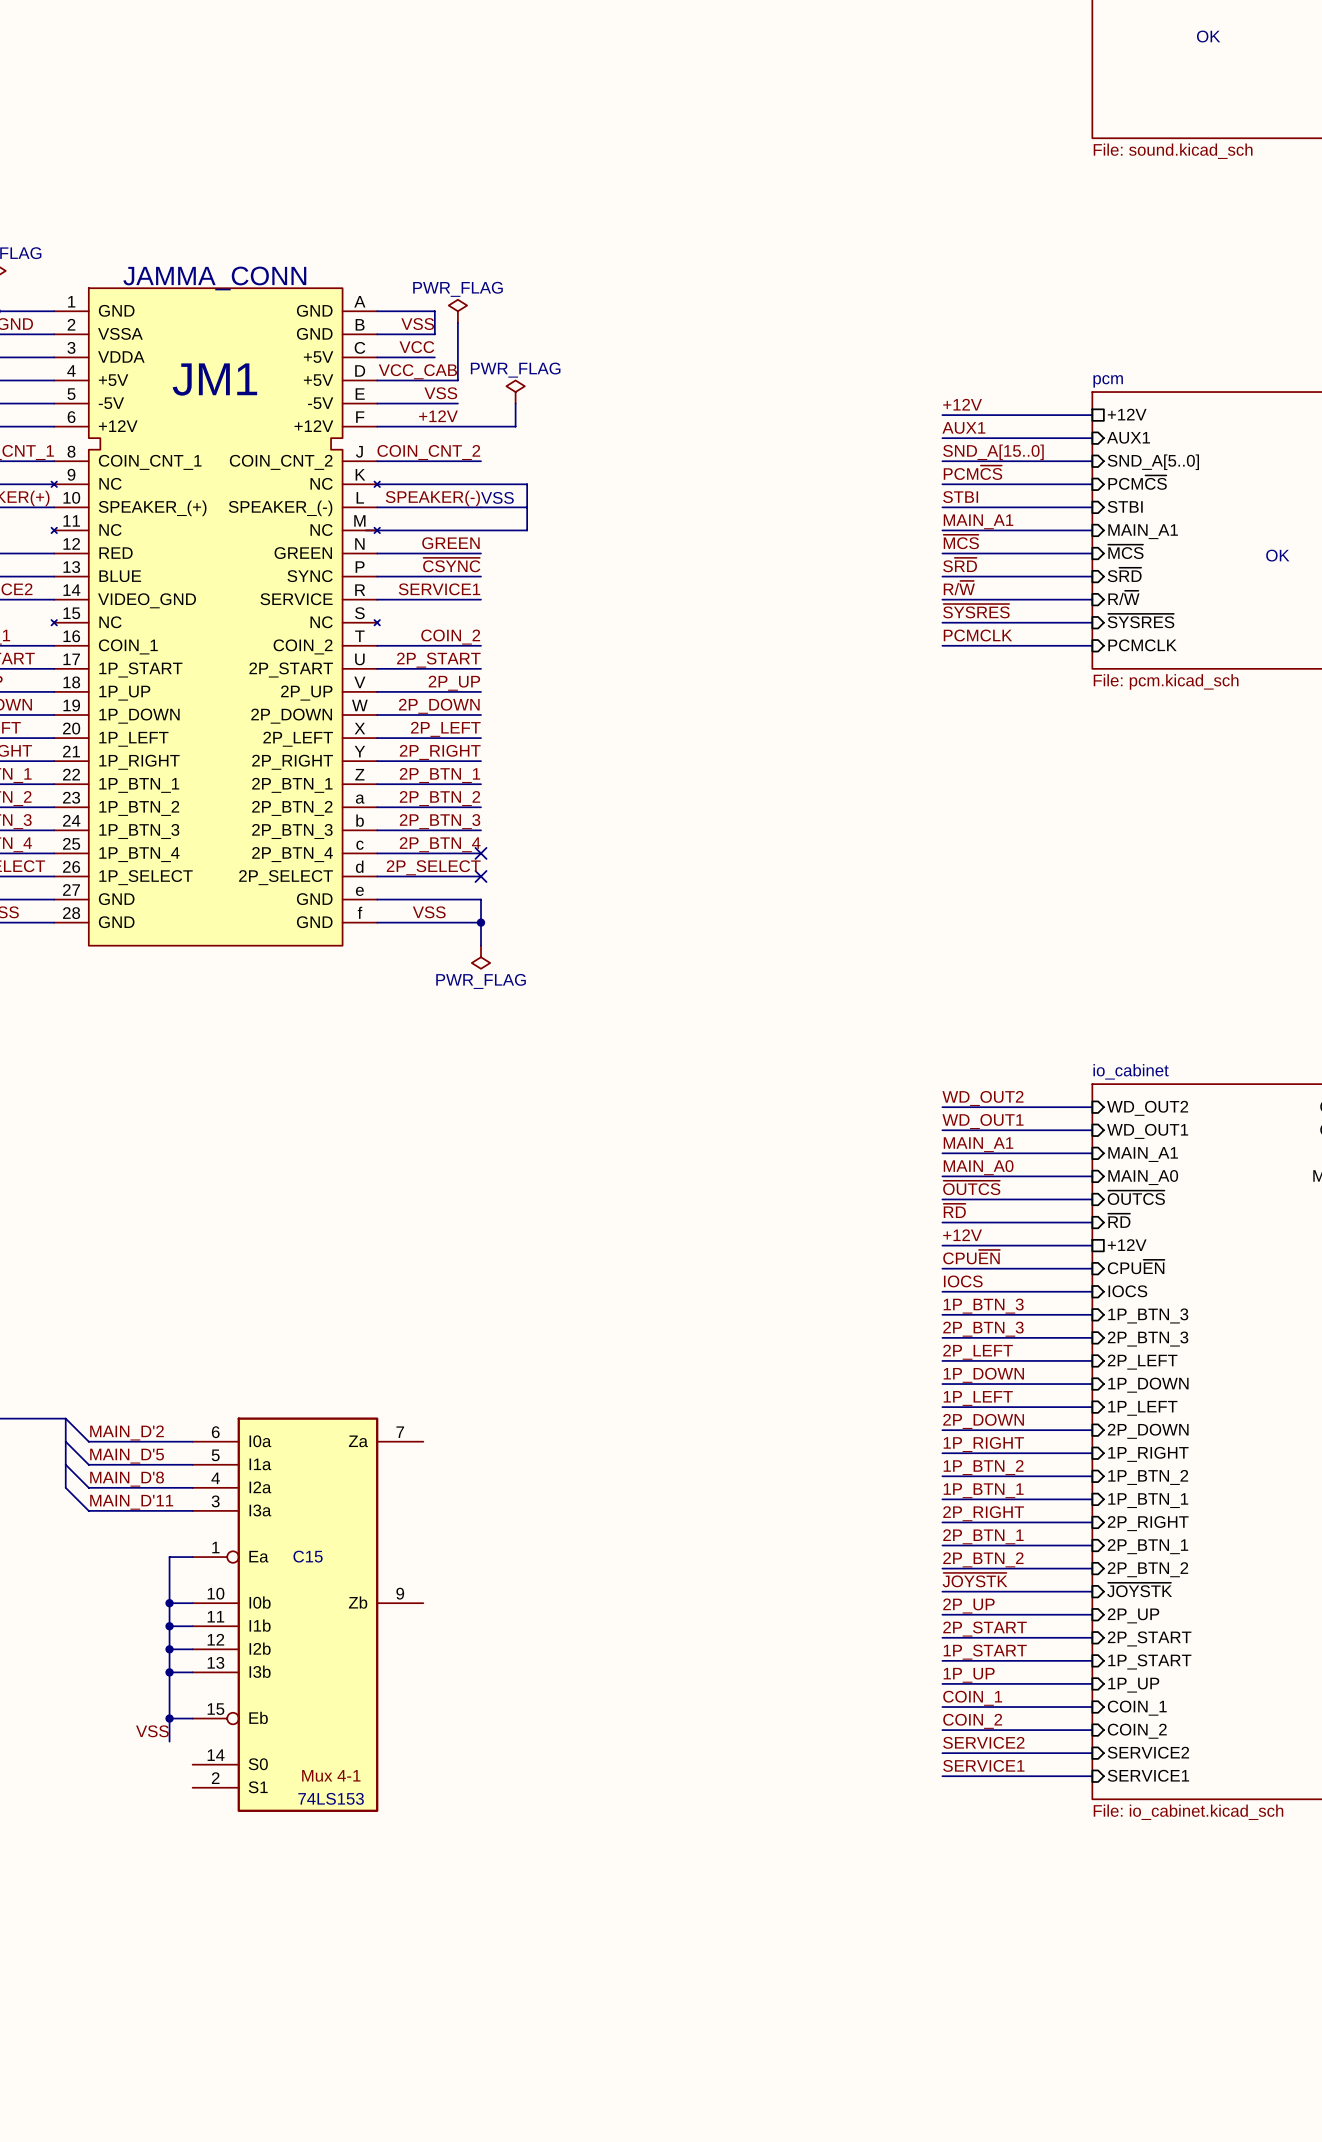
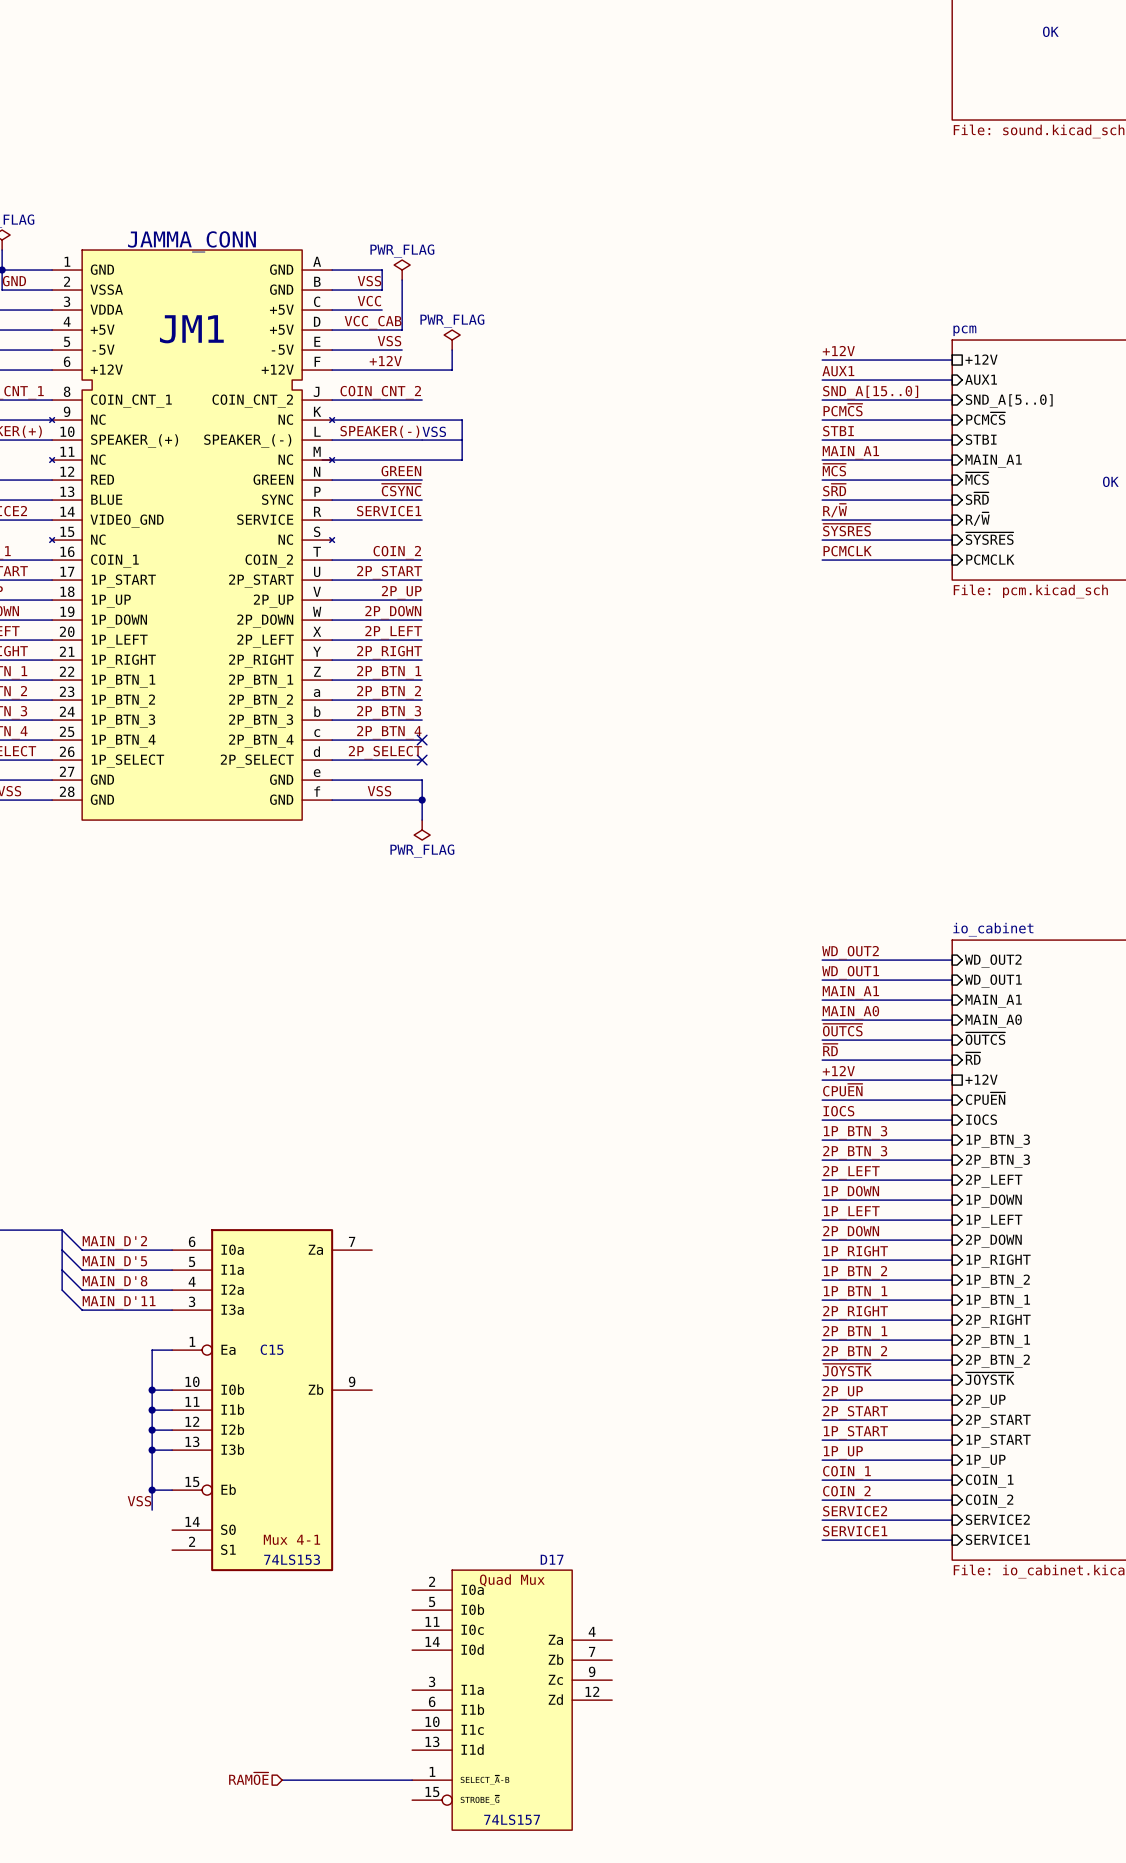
D17: none -> 74LS157 (512, 1700)
hierarchical label: none -> RAM~{OE} (248, 1778)
wire: none -> (282, 1780) (412, 1780)

